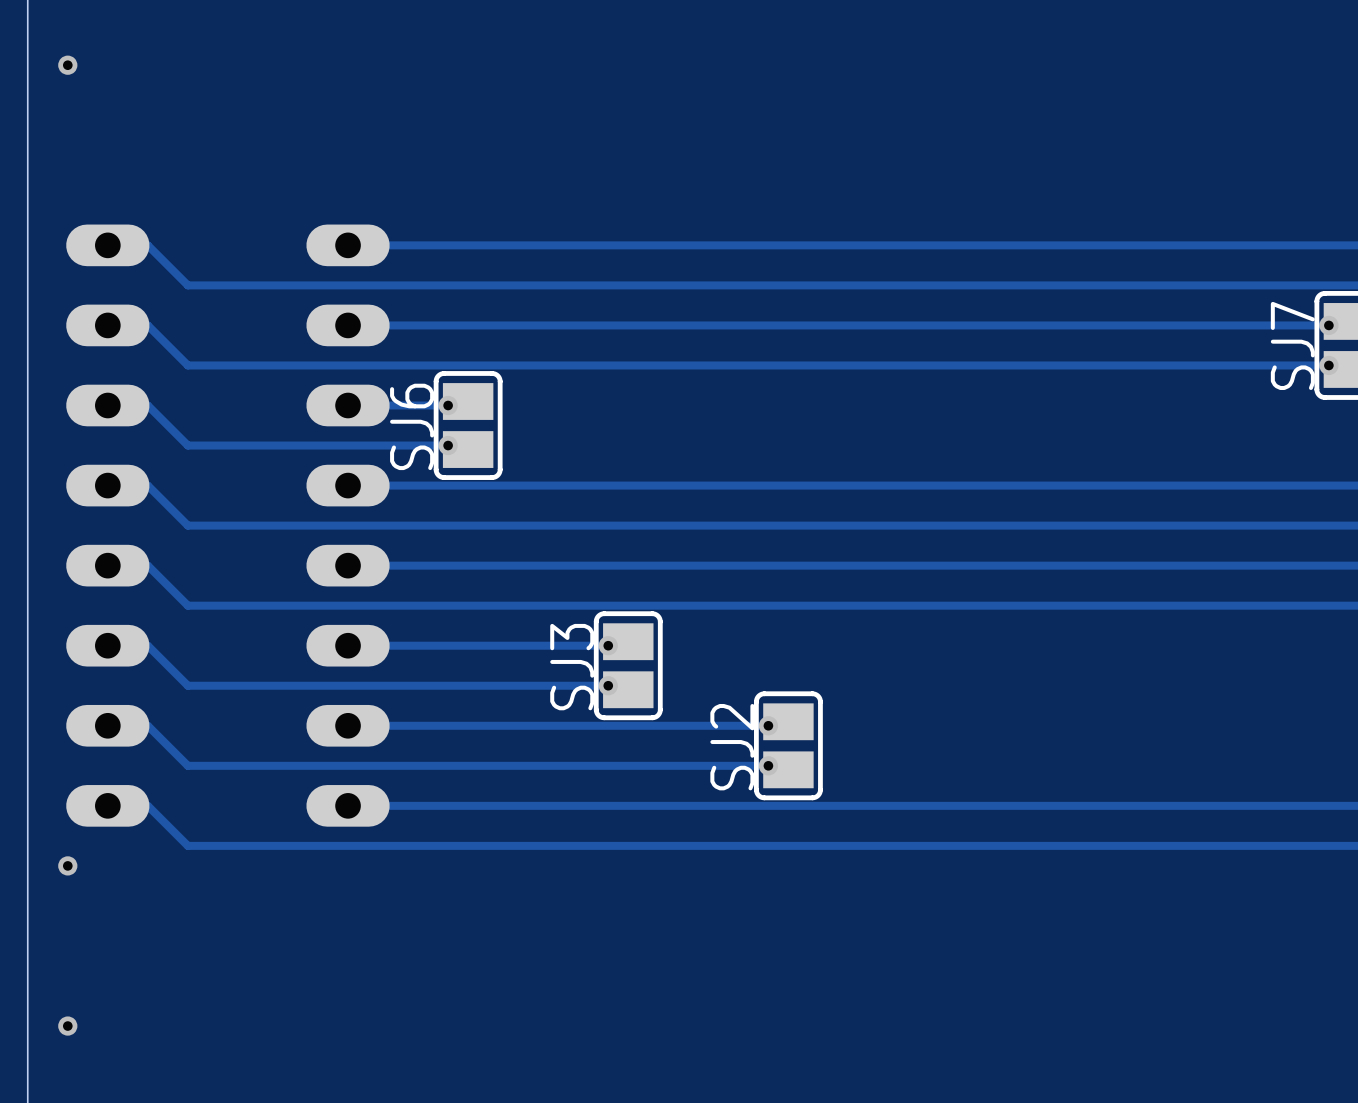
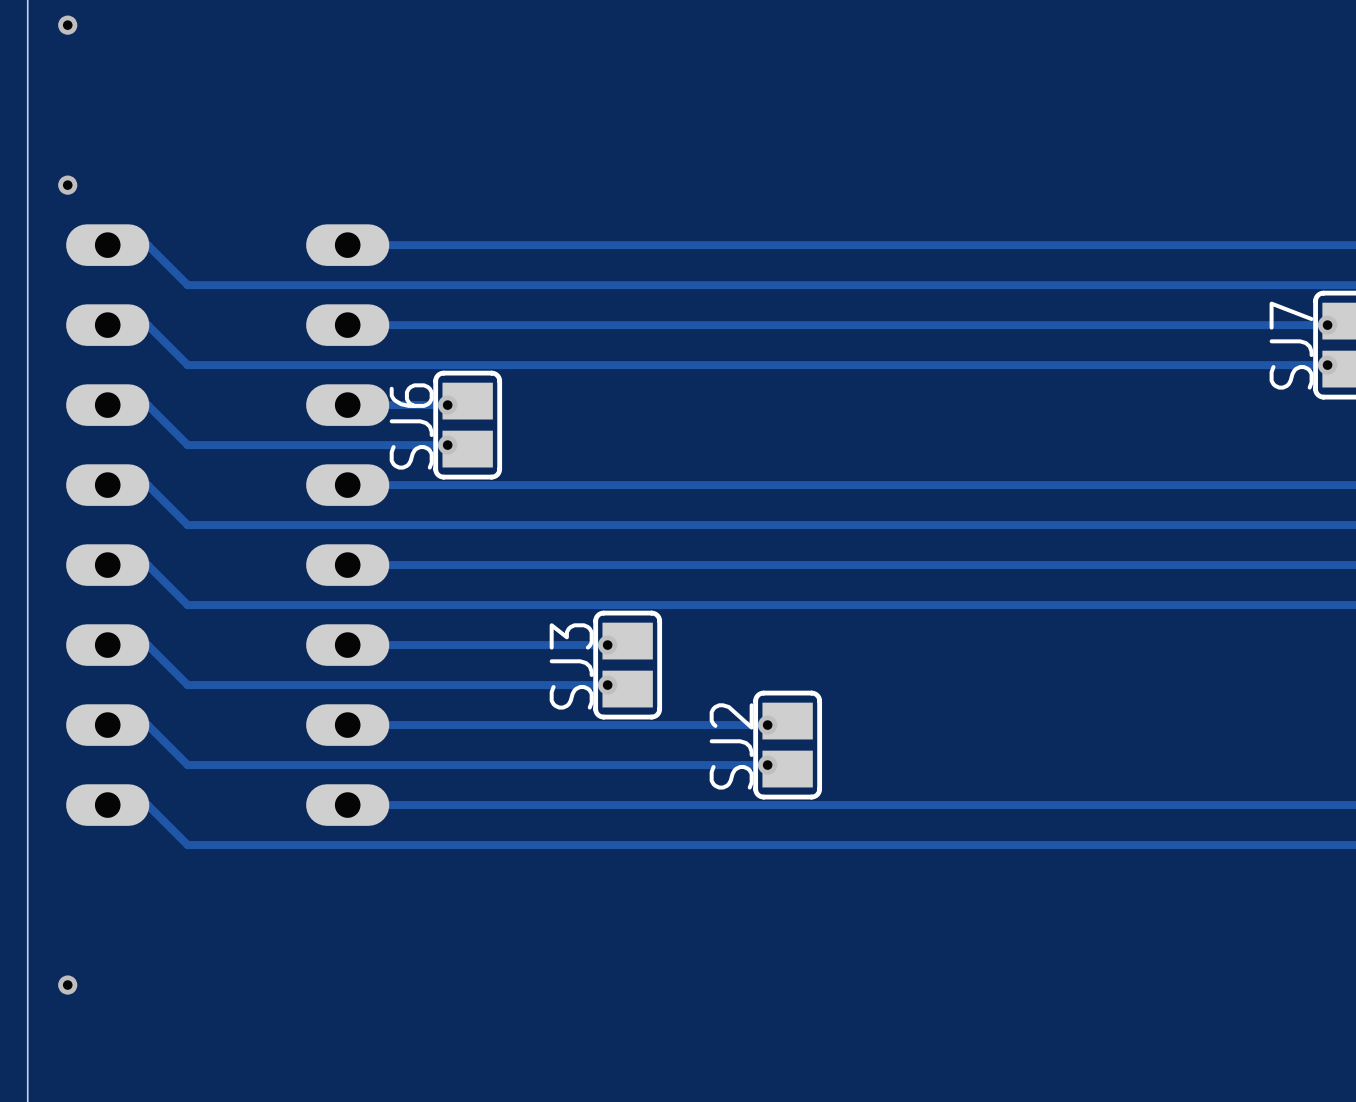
via position: (67, 65) -> (67, 25)
via: none -> (67, 185)
via: (67, 865) -> none
via position: (67, 1026) -> (67, 985)

